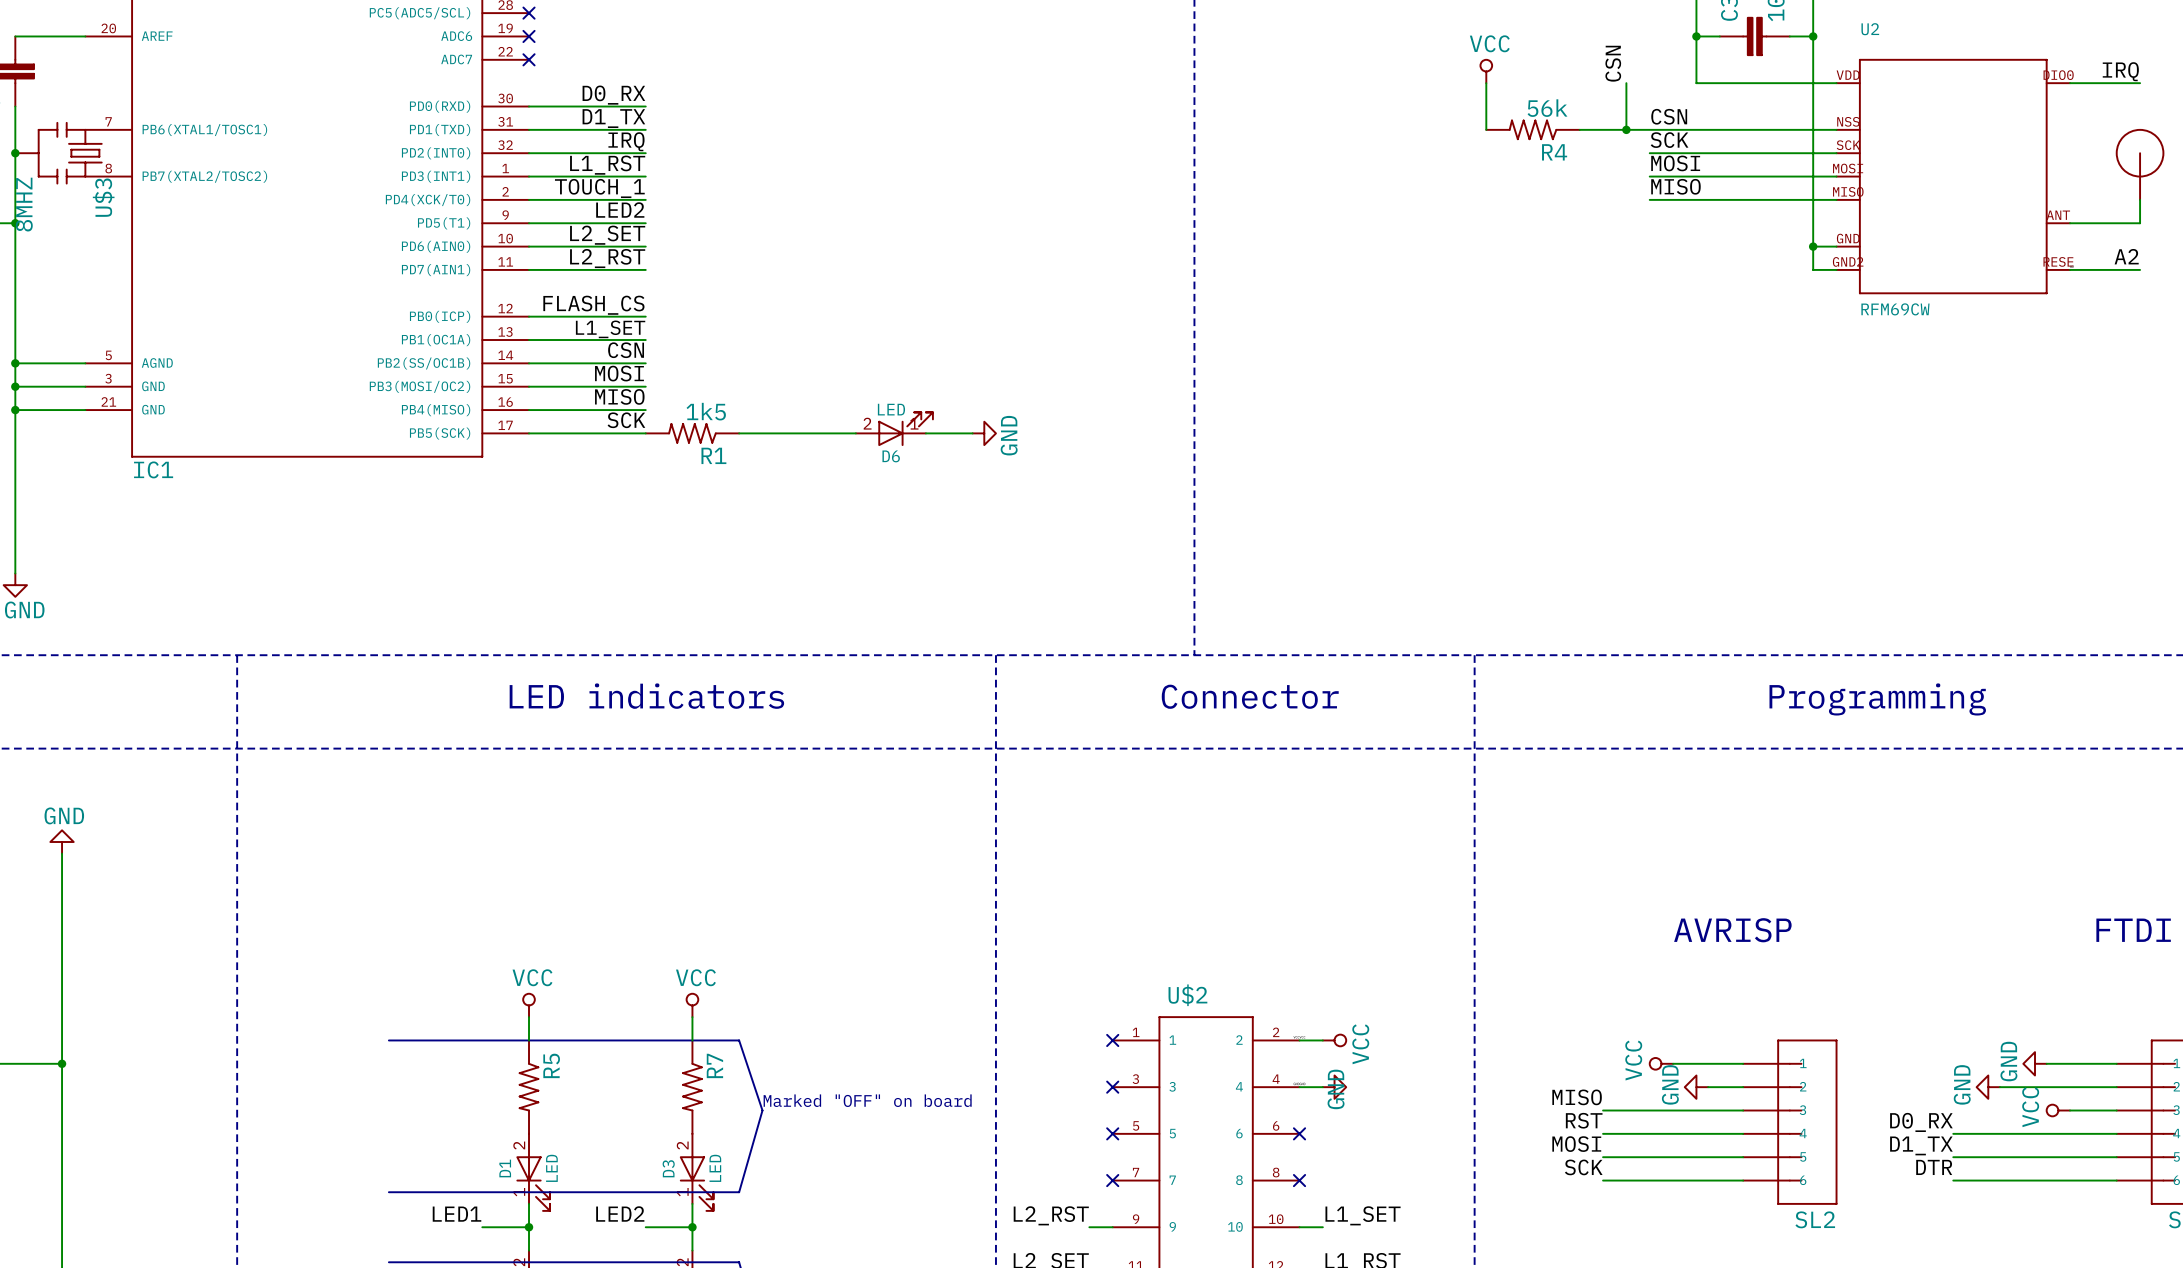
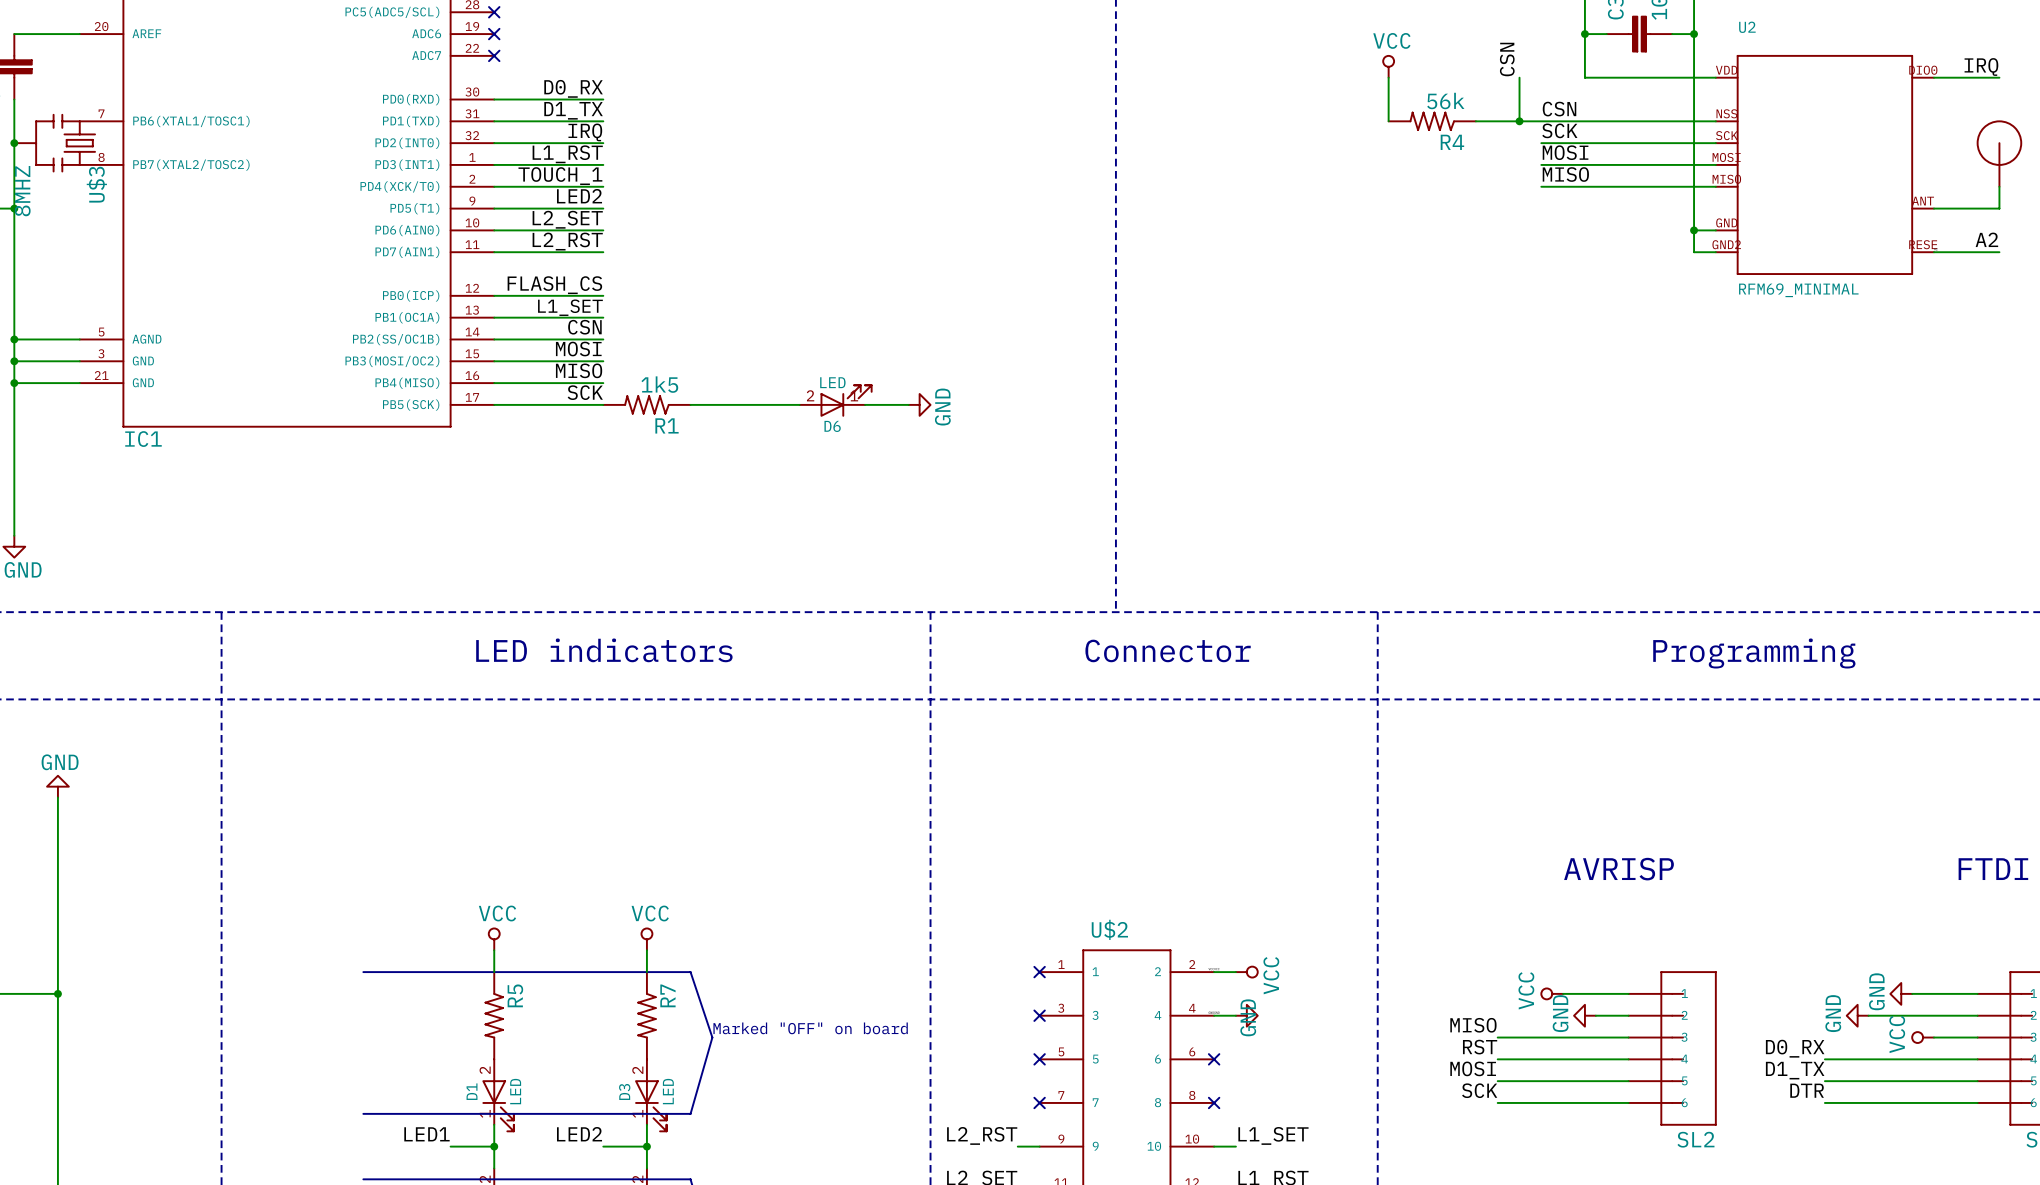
U2 value: RFM69CW (1895, 309) -> RFM69_MINIMAL (1798, 290)

